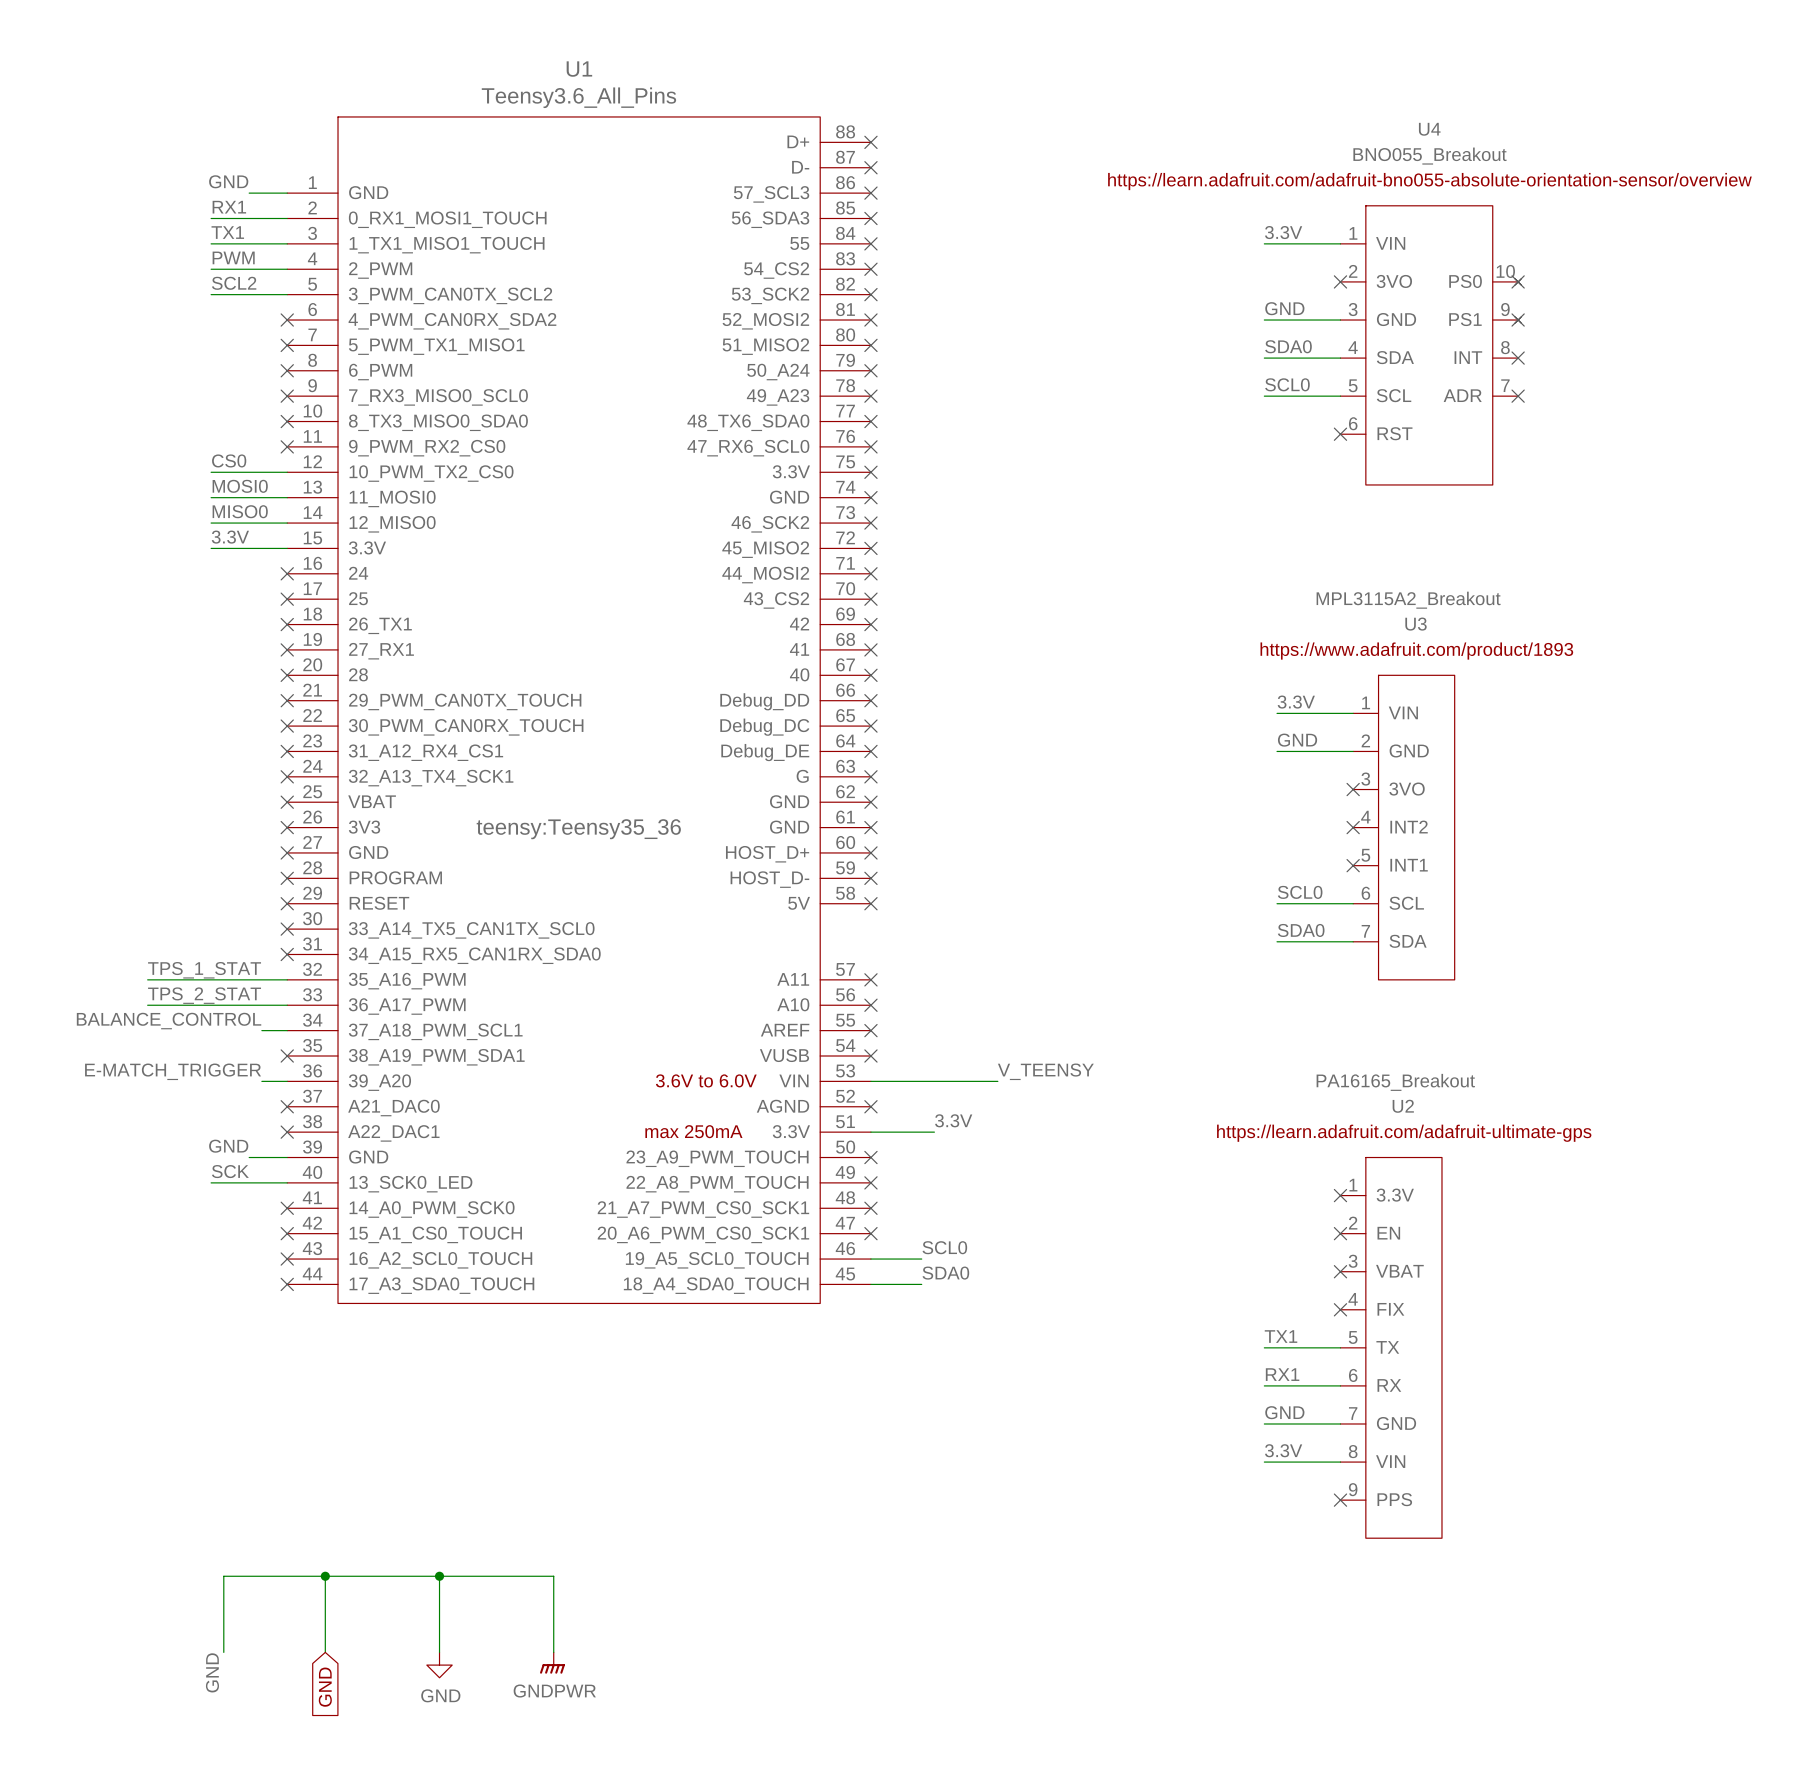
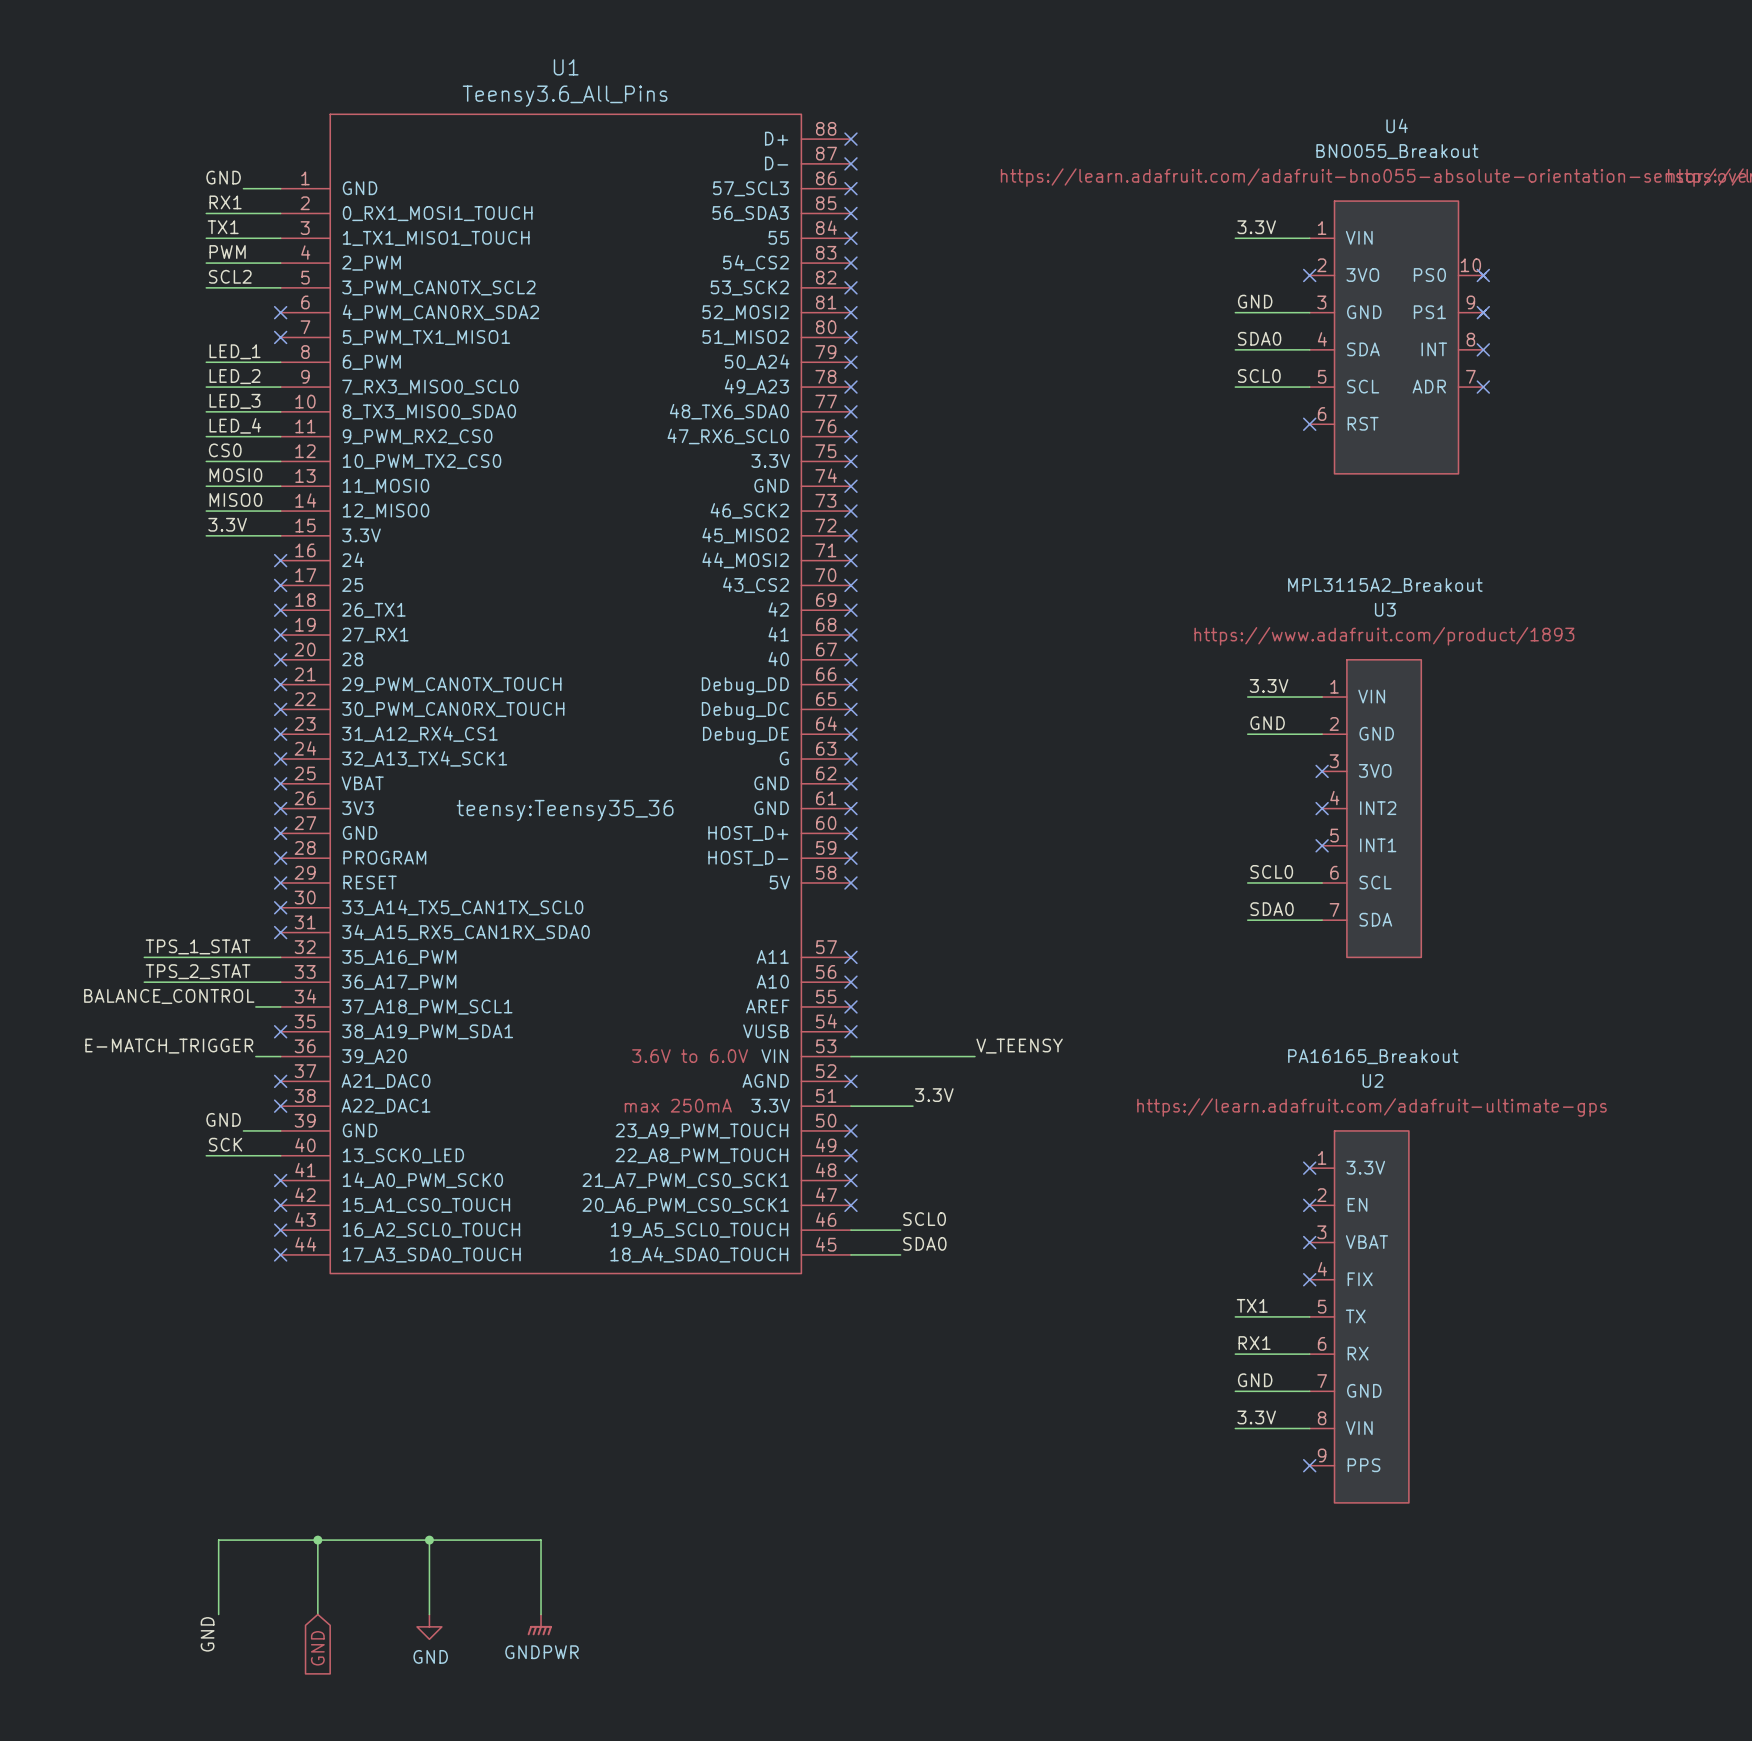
label: none -> LED_1 (234, 351)
wire: none -> (206, 362) (280, 362)
no-connect mark: (287, 370) -> none
label: none -> LED_2 (234, 376)
wire: none -> (206, 387) (280, 387)
no-connect mark: (287, 396) -> none
label: none -> LED_3 (234, 401)
wire: none -> (206, 411) (280, 411)
no-connect mark: (287, 421) -> none
label: none -> LED_4 (235, 425)
wire: none -> (206, 436) (280, 436)
no-connect mark: (287, 446) -> none

